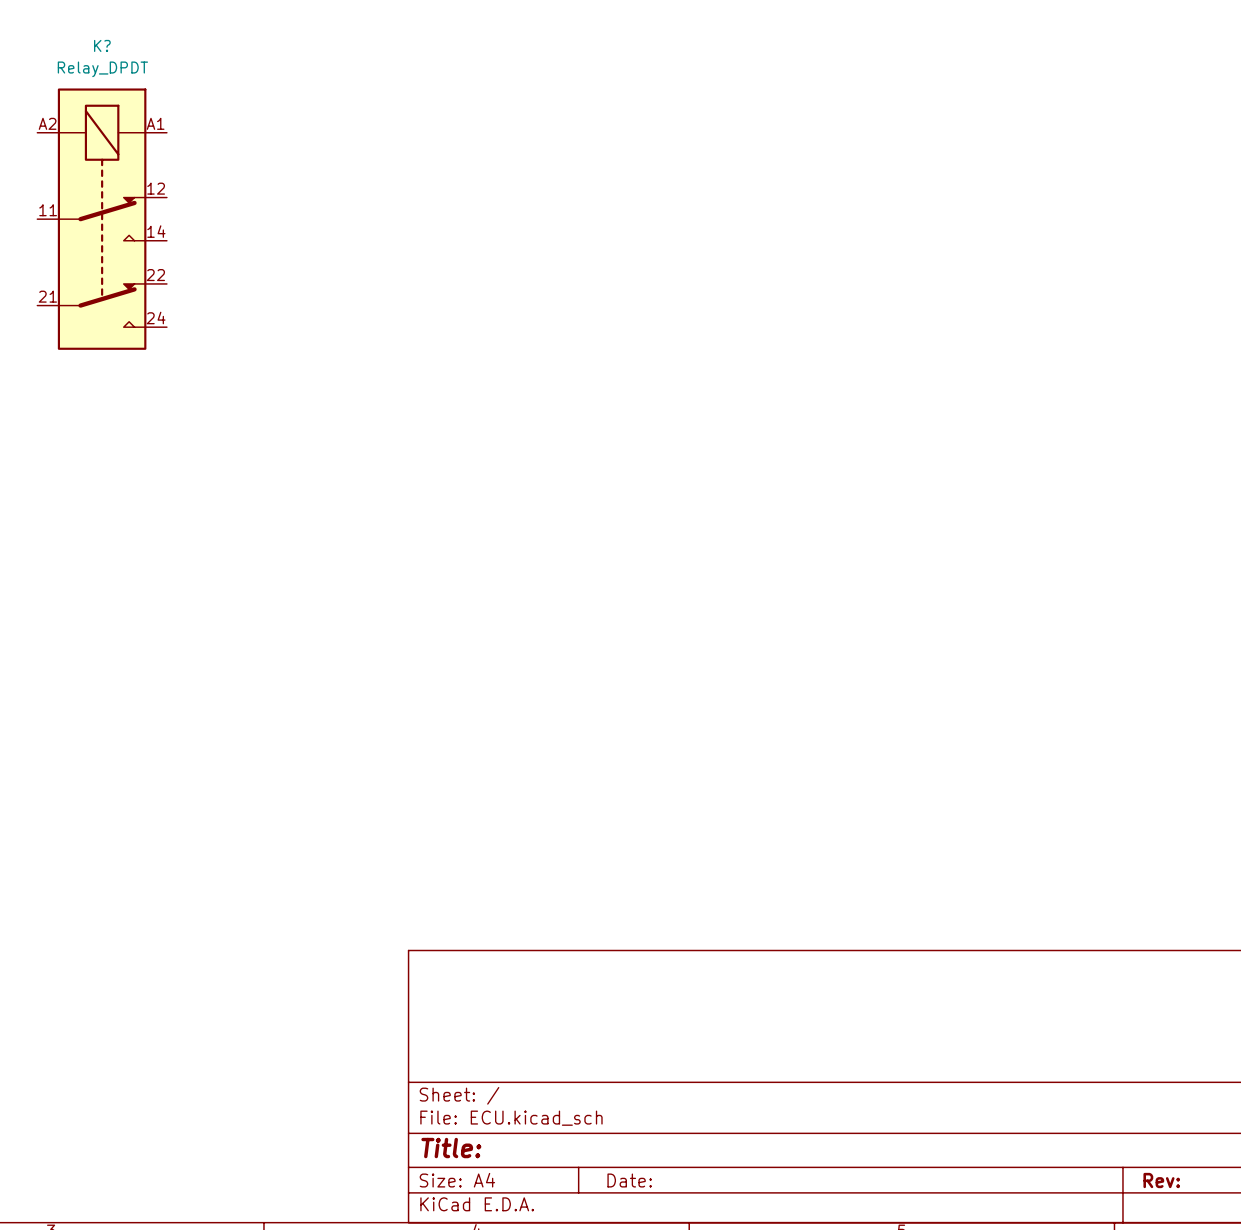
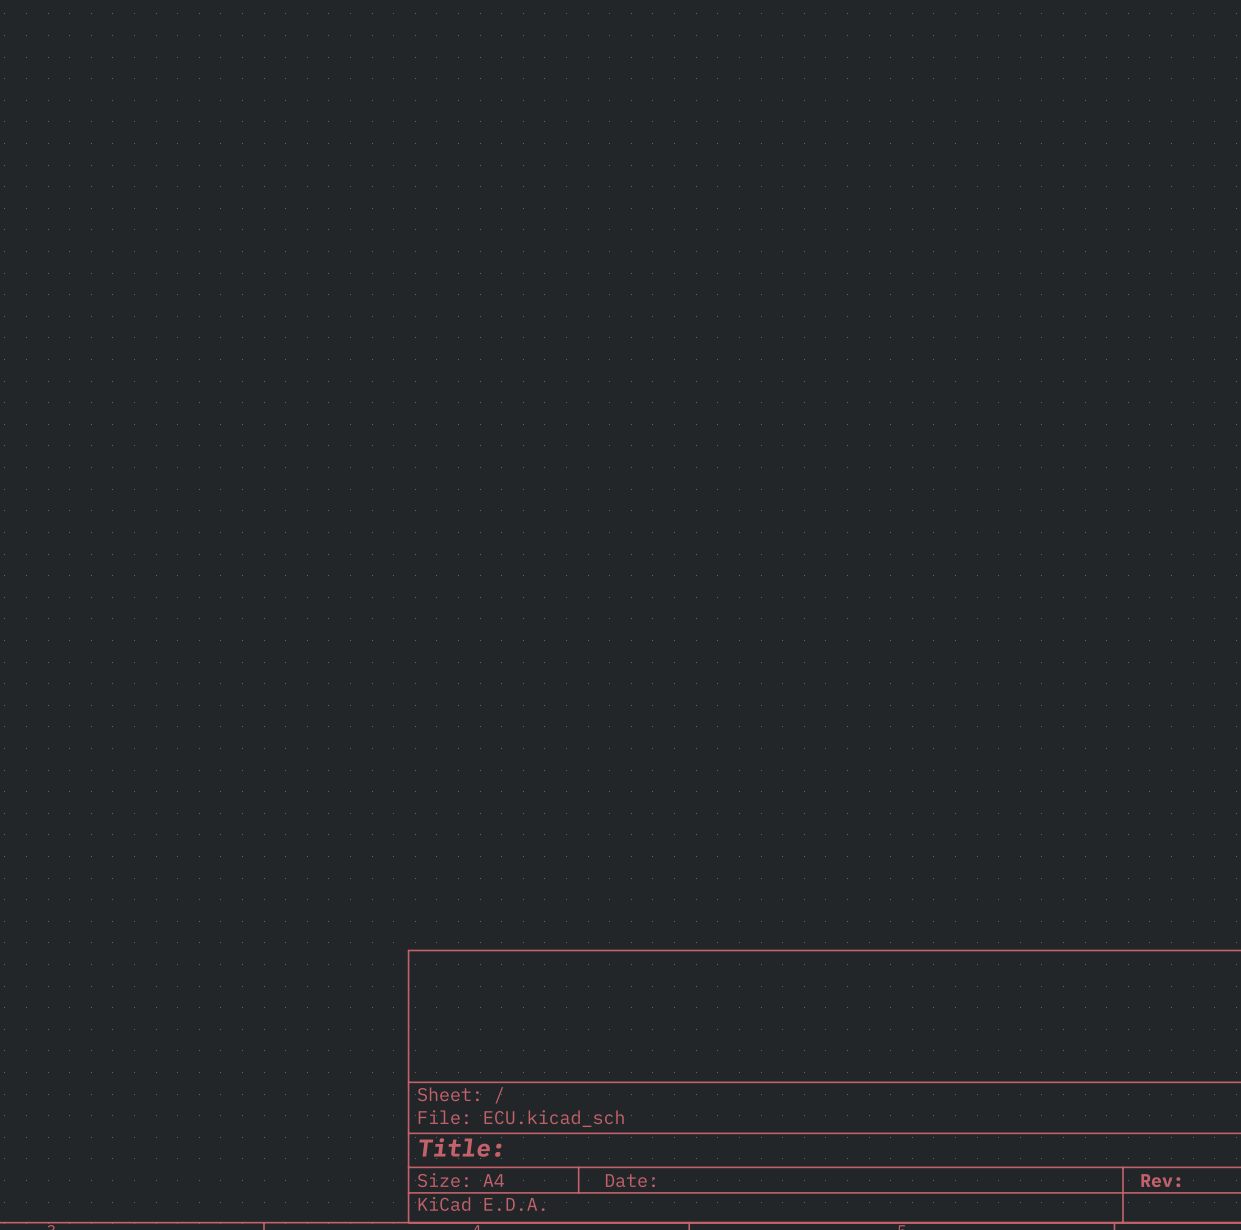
K?: Relay_DPDT (102, 219) -> none

